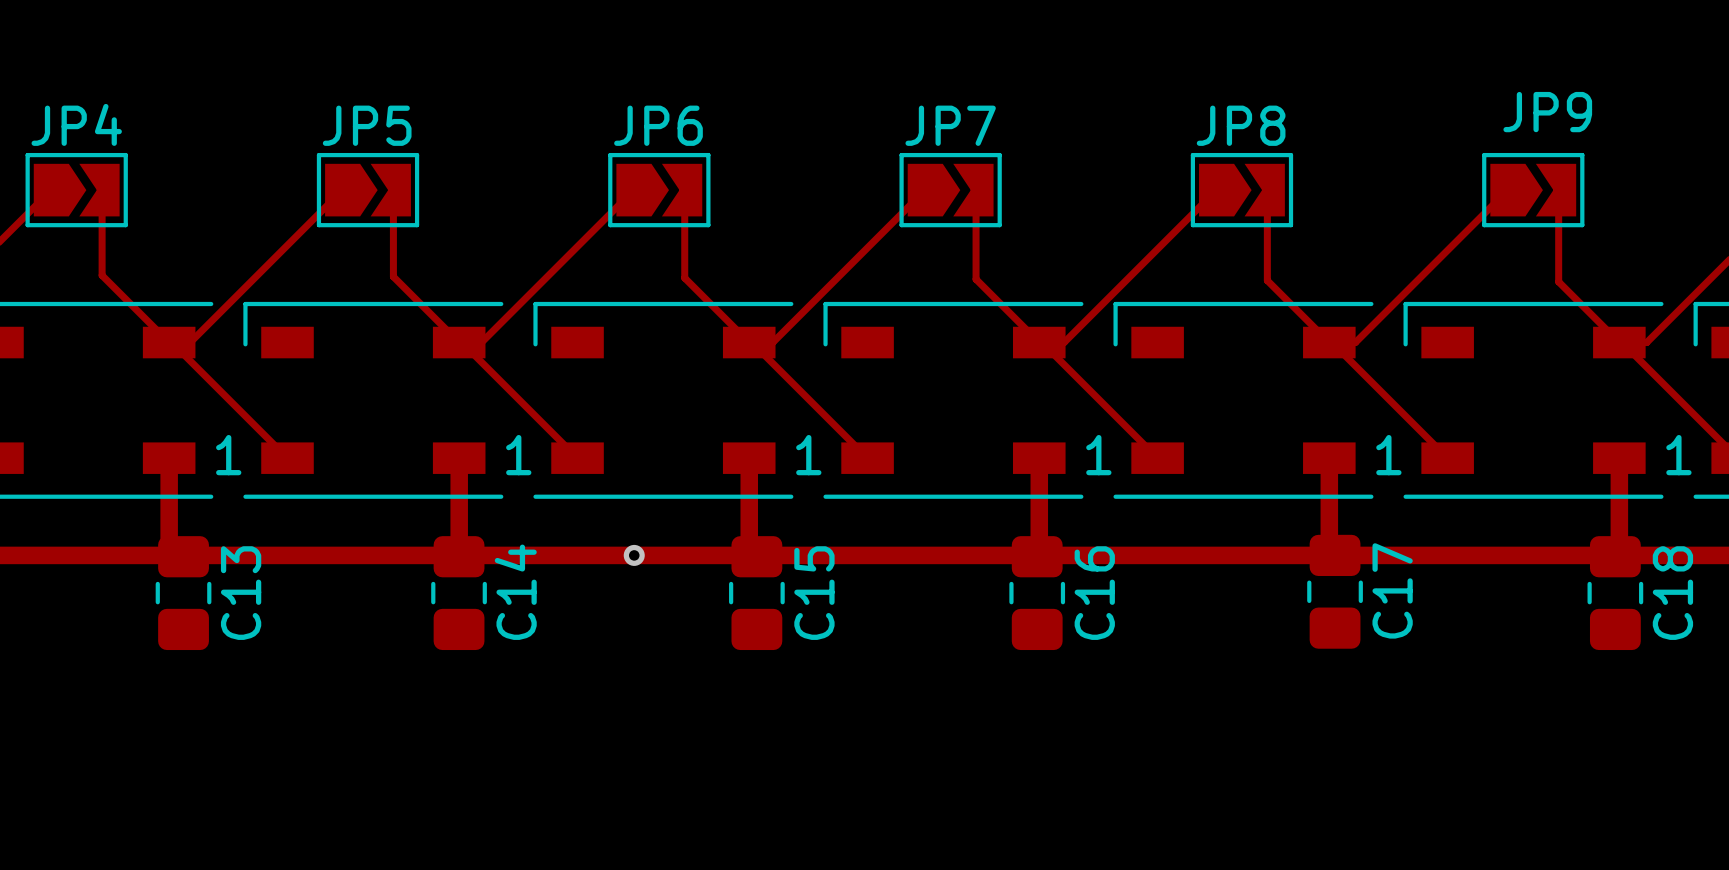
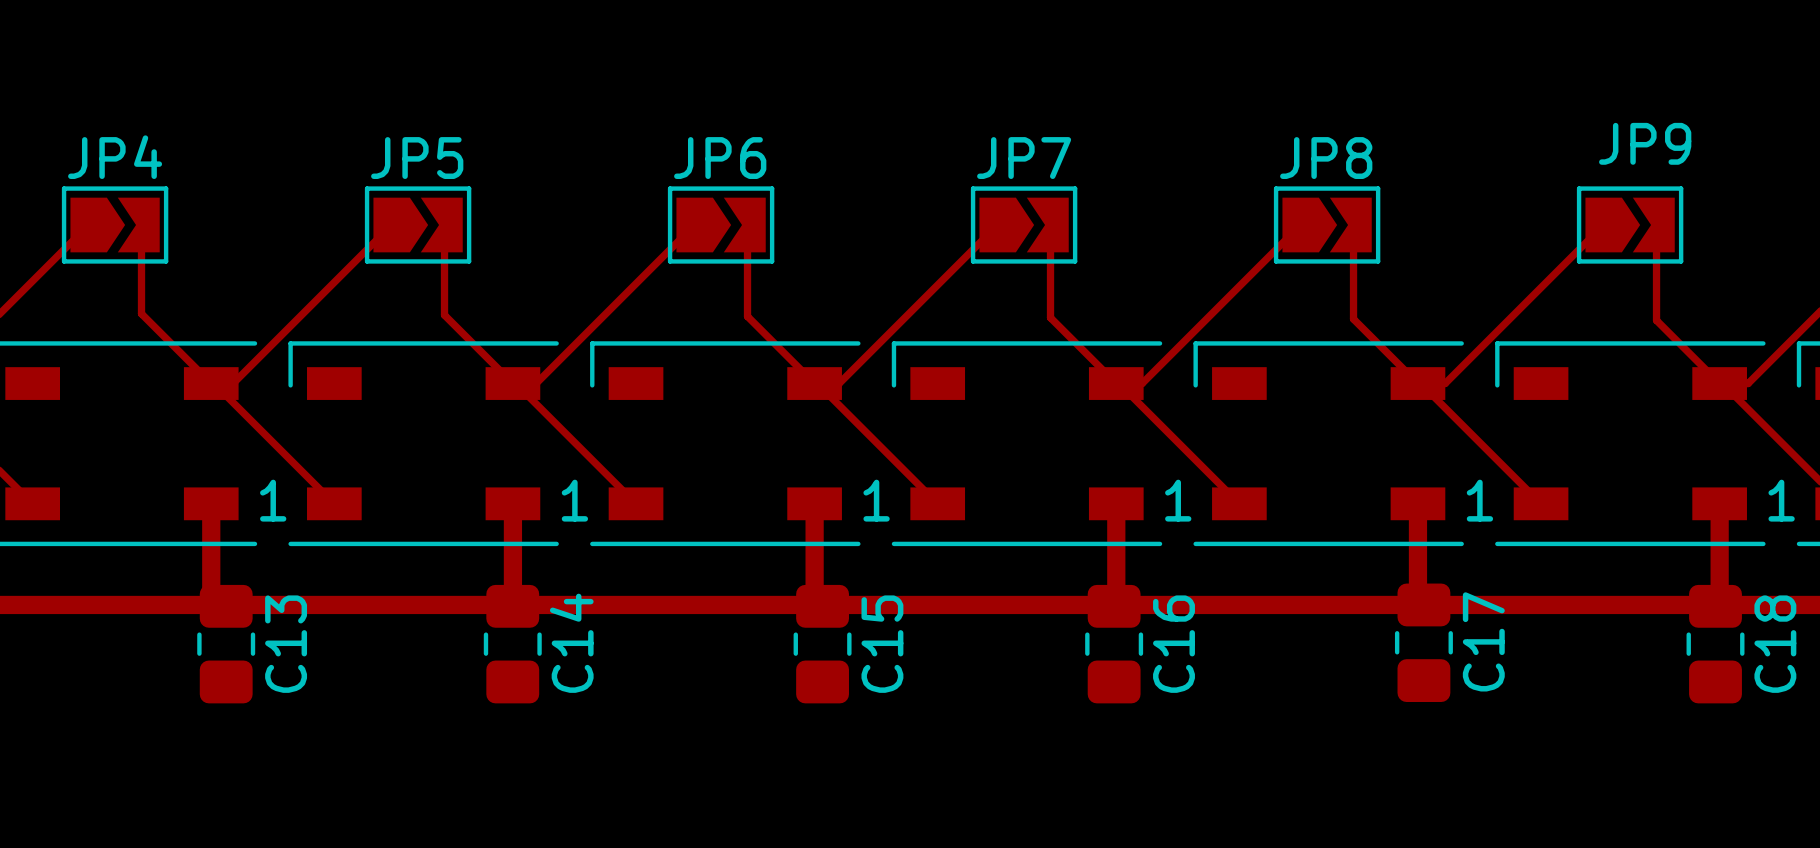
via: (634, 555) -> none

